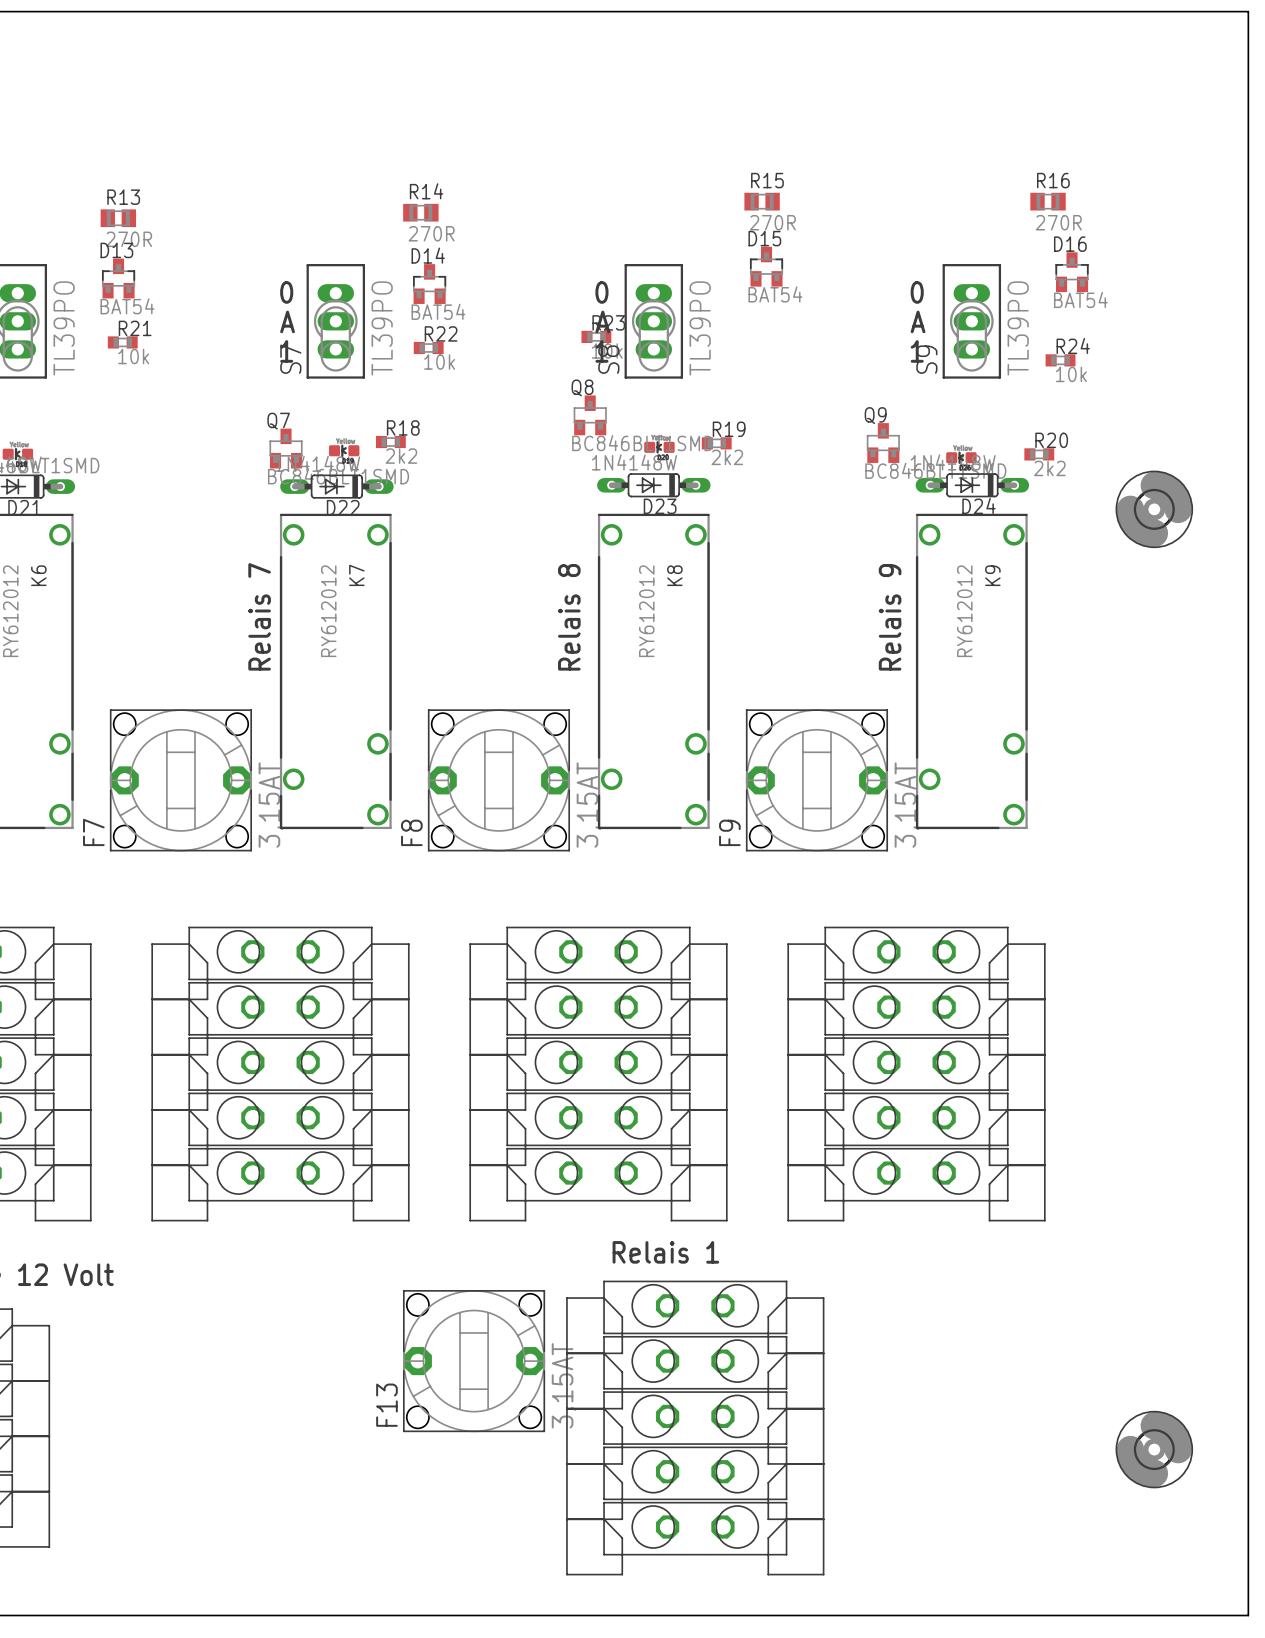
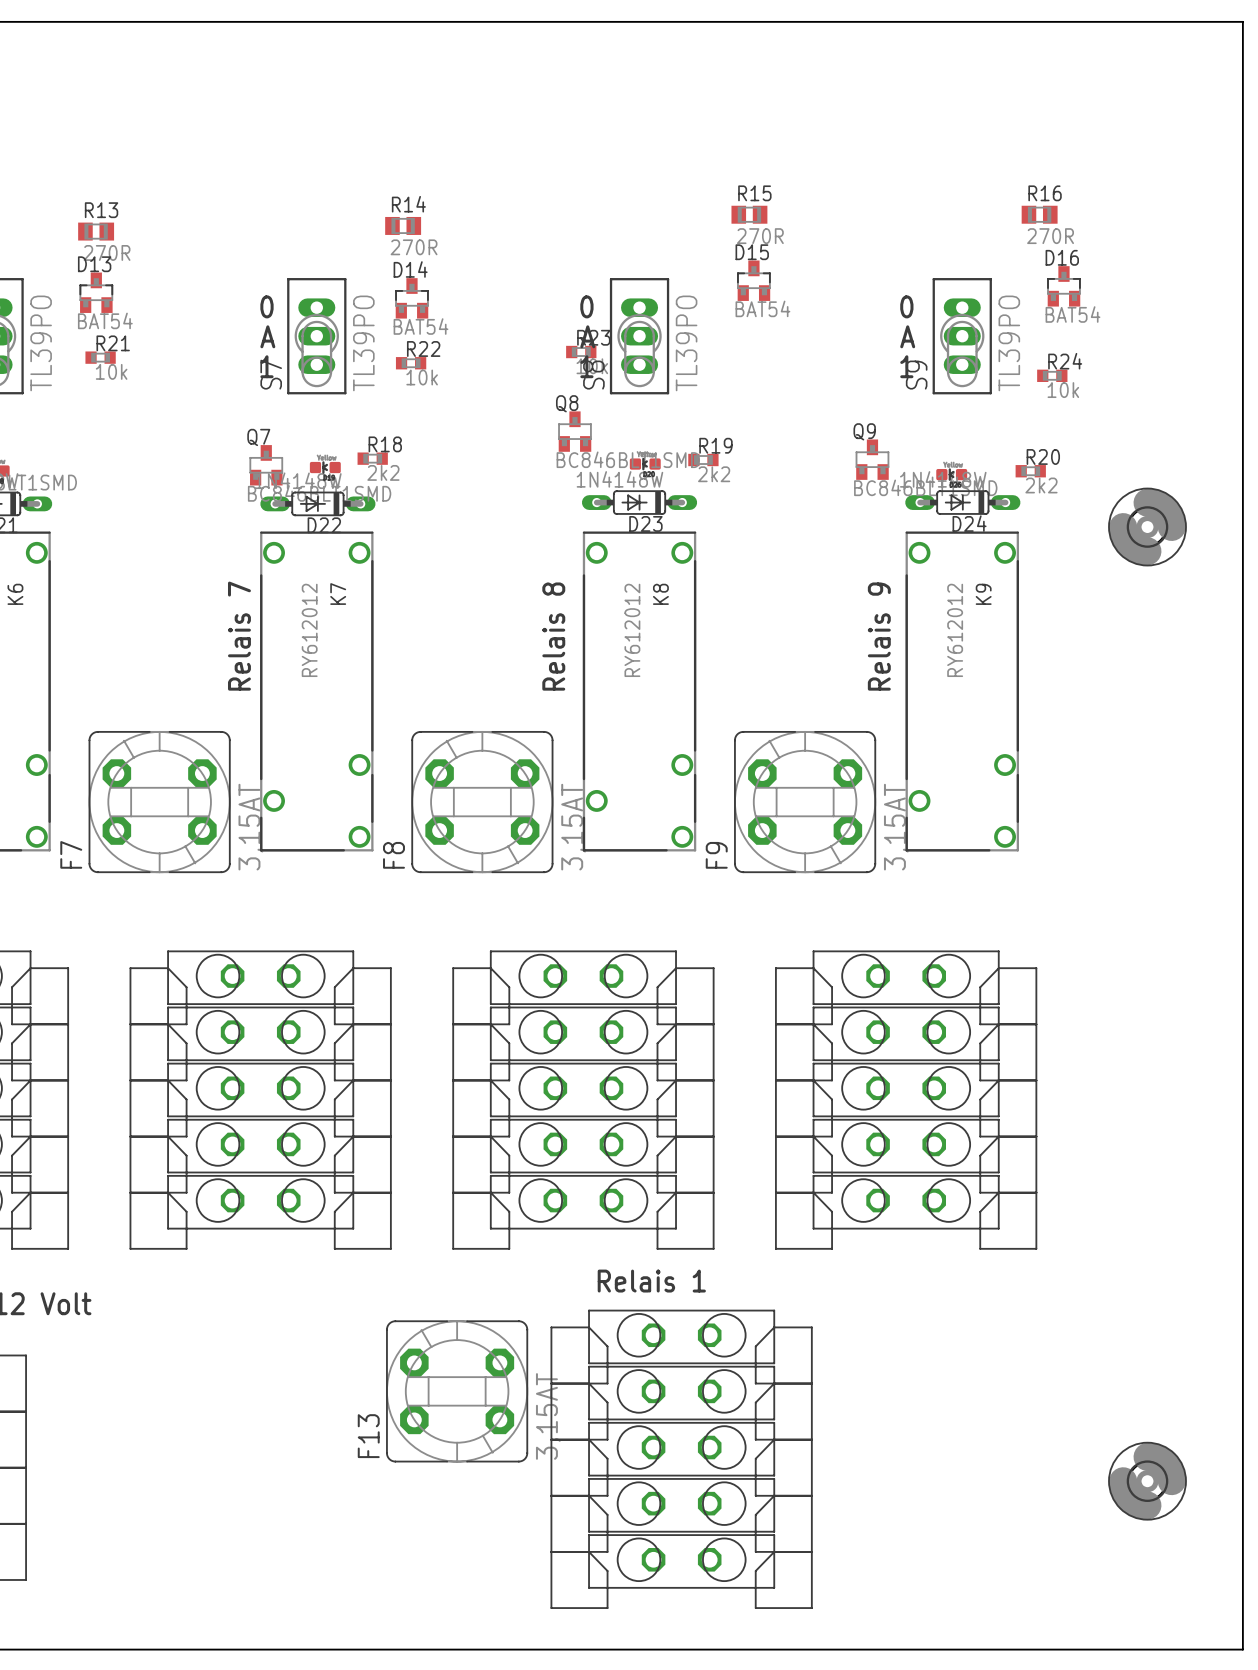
F7 footprint: [109, 709, 253, 852] -> [88, 731, 231, 874]
F8 footprint: [427, 709, 571, 852] -> [411, 731, 554, 874]
F9 footprint: [745, 709, 889, 852] -> [734, 731, 877, 874]
F13 footprint: [402, 1290, 546, 1433] -> [386, 1320, 529, 1463]

